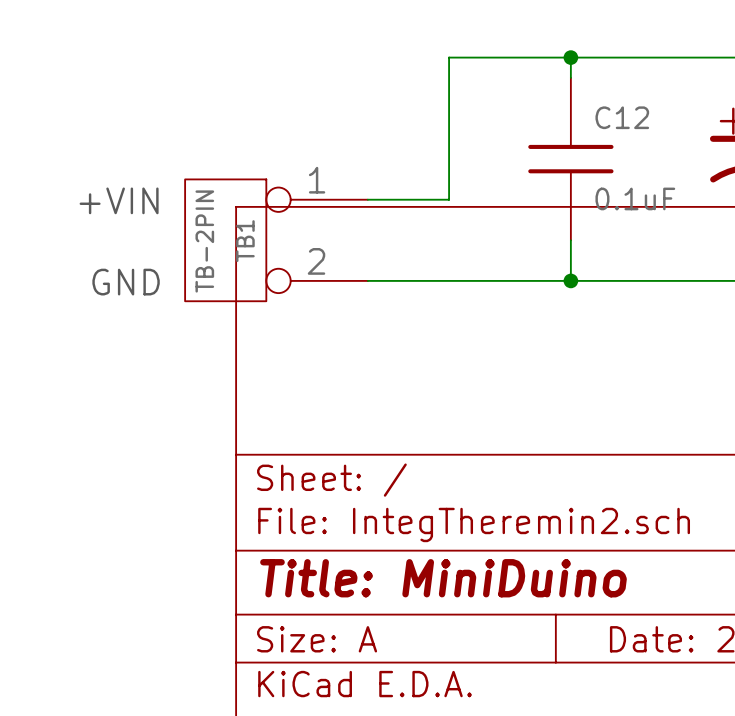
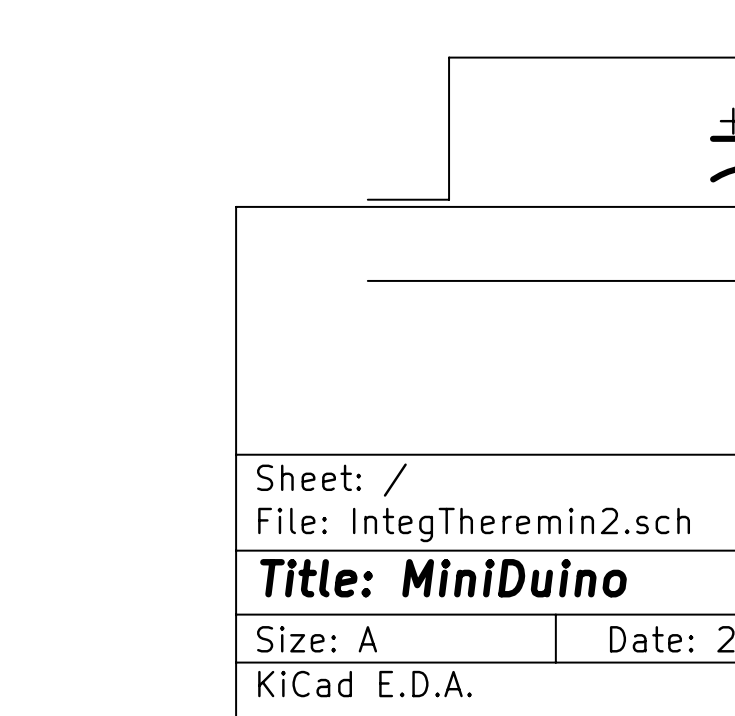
wire: (570, 57) (570, 77) -> none
junction: (570, 57) -> none
C12: 0.1uF (570, 159) -> none
text: +VIN (119, 200) -> none
TB1: TB-2PIN (276, 240) -> none
wire: (570, 240) (570, 280) -> none
junction: (570, 280) -> none
text: GND (126, 282) -> none

